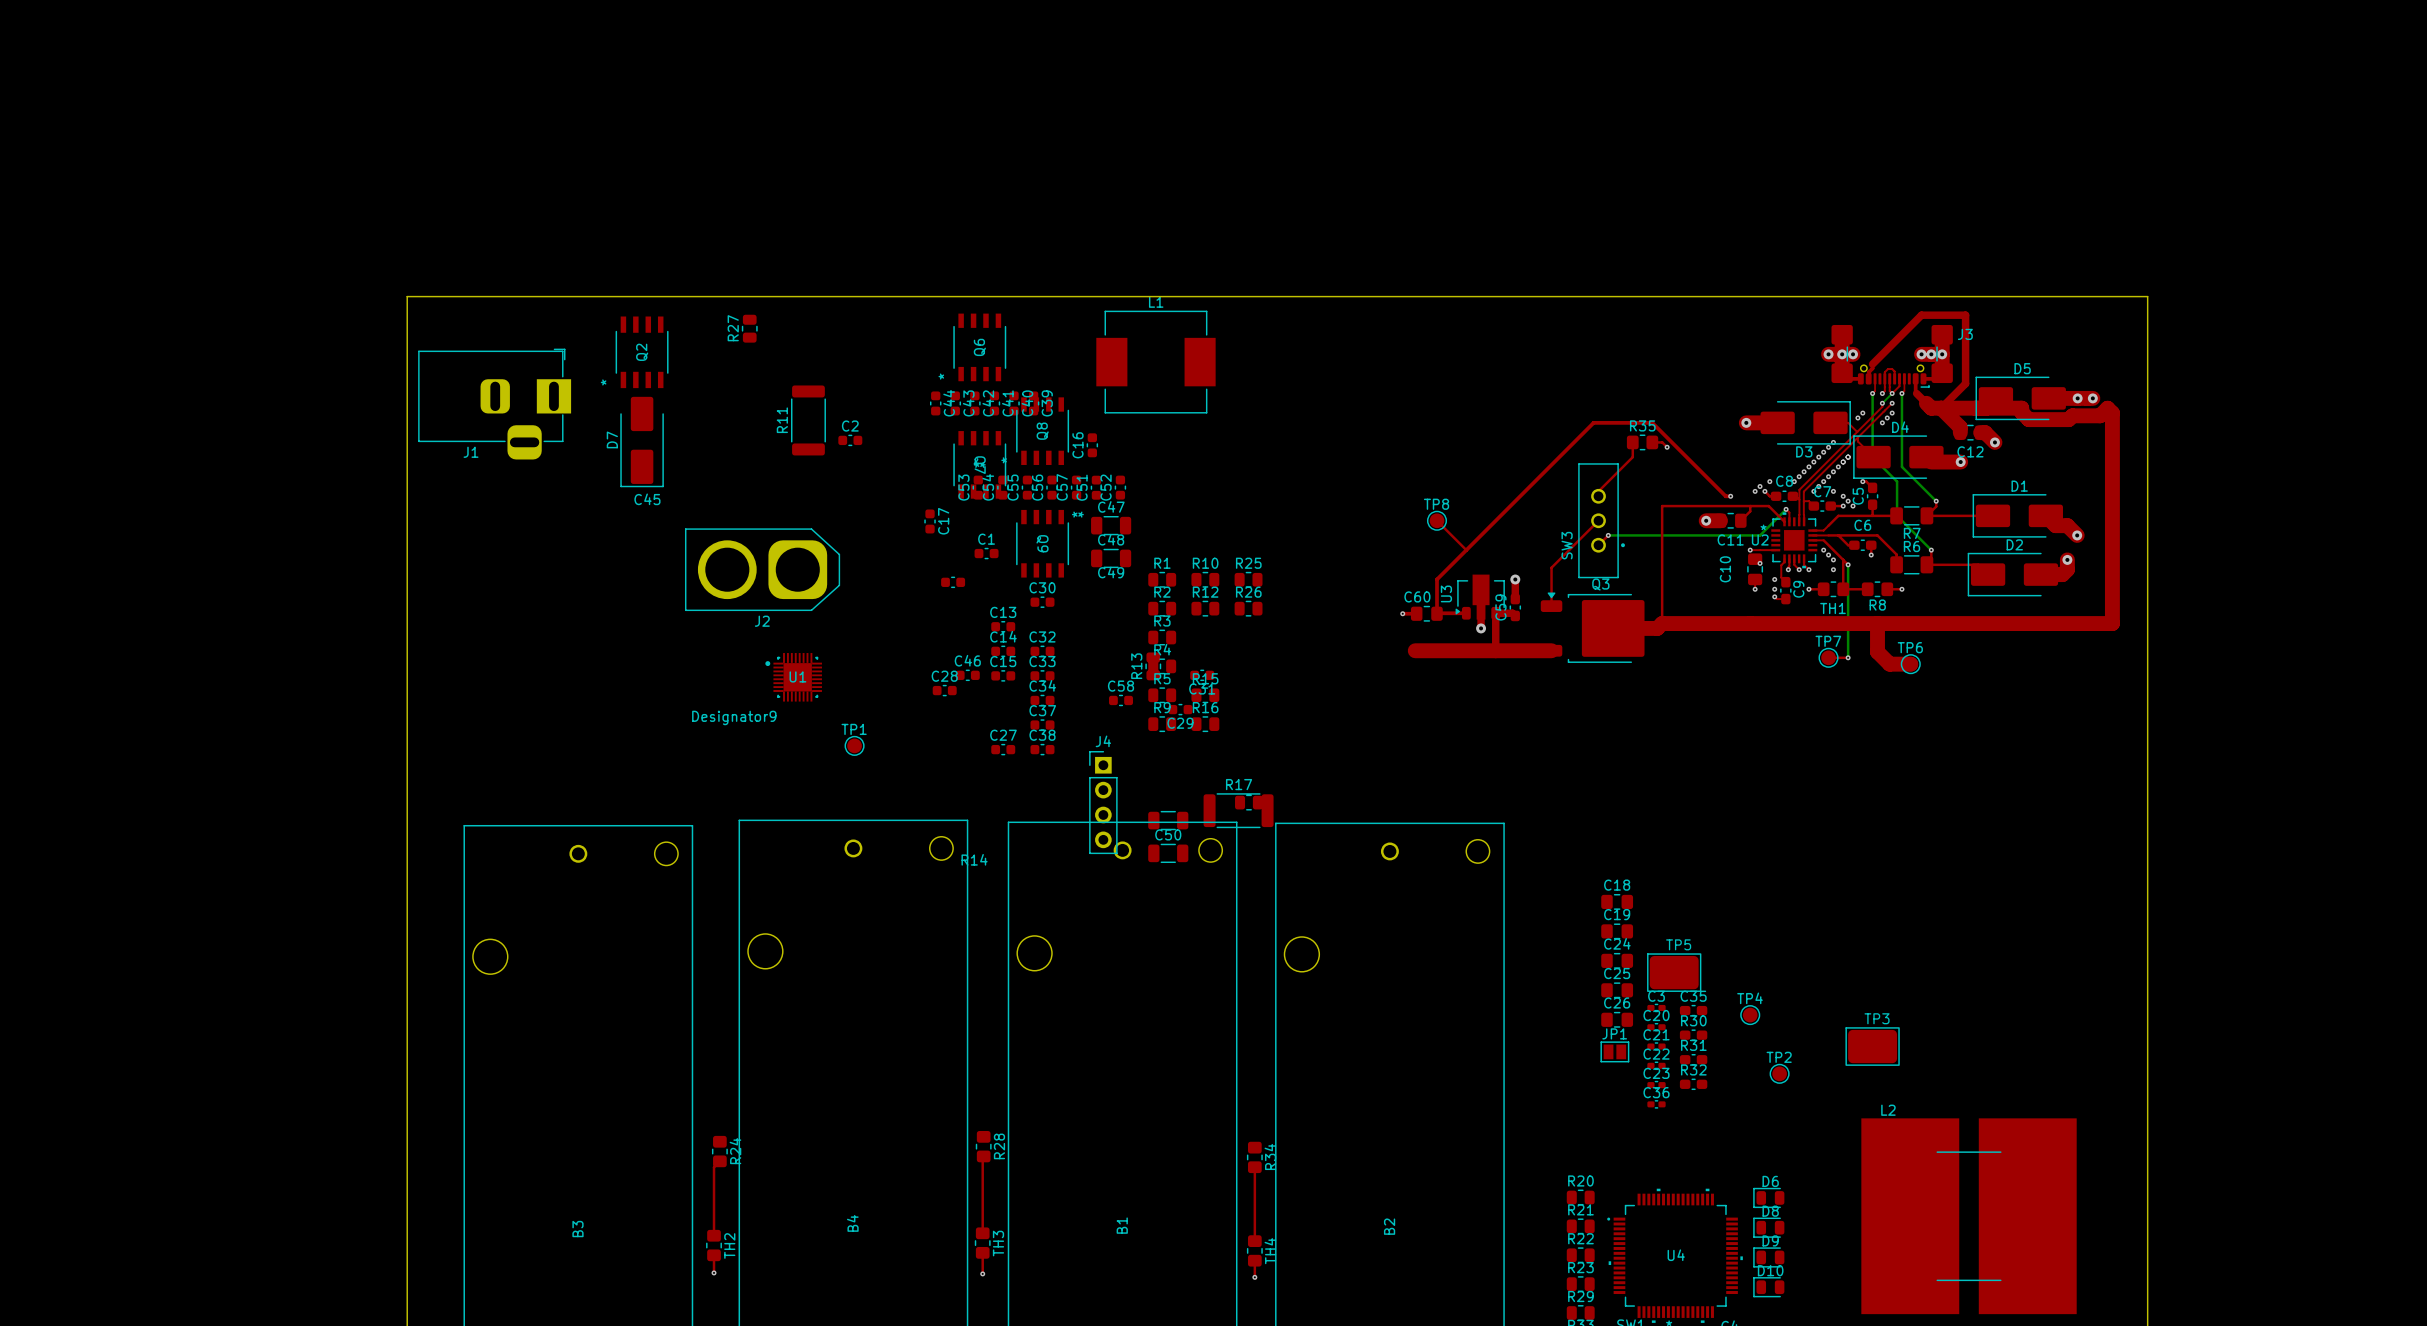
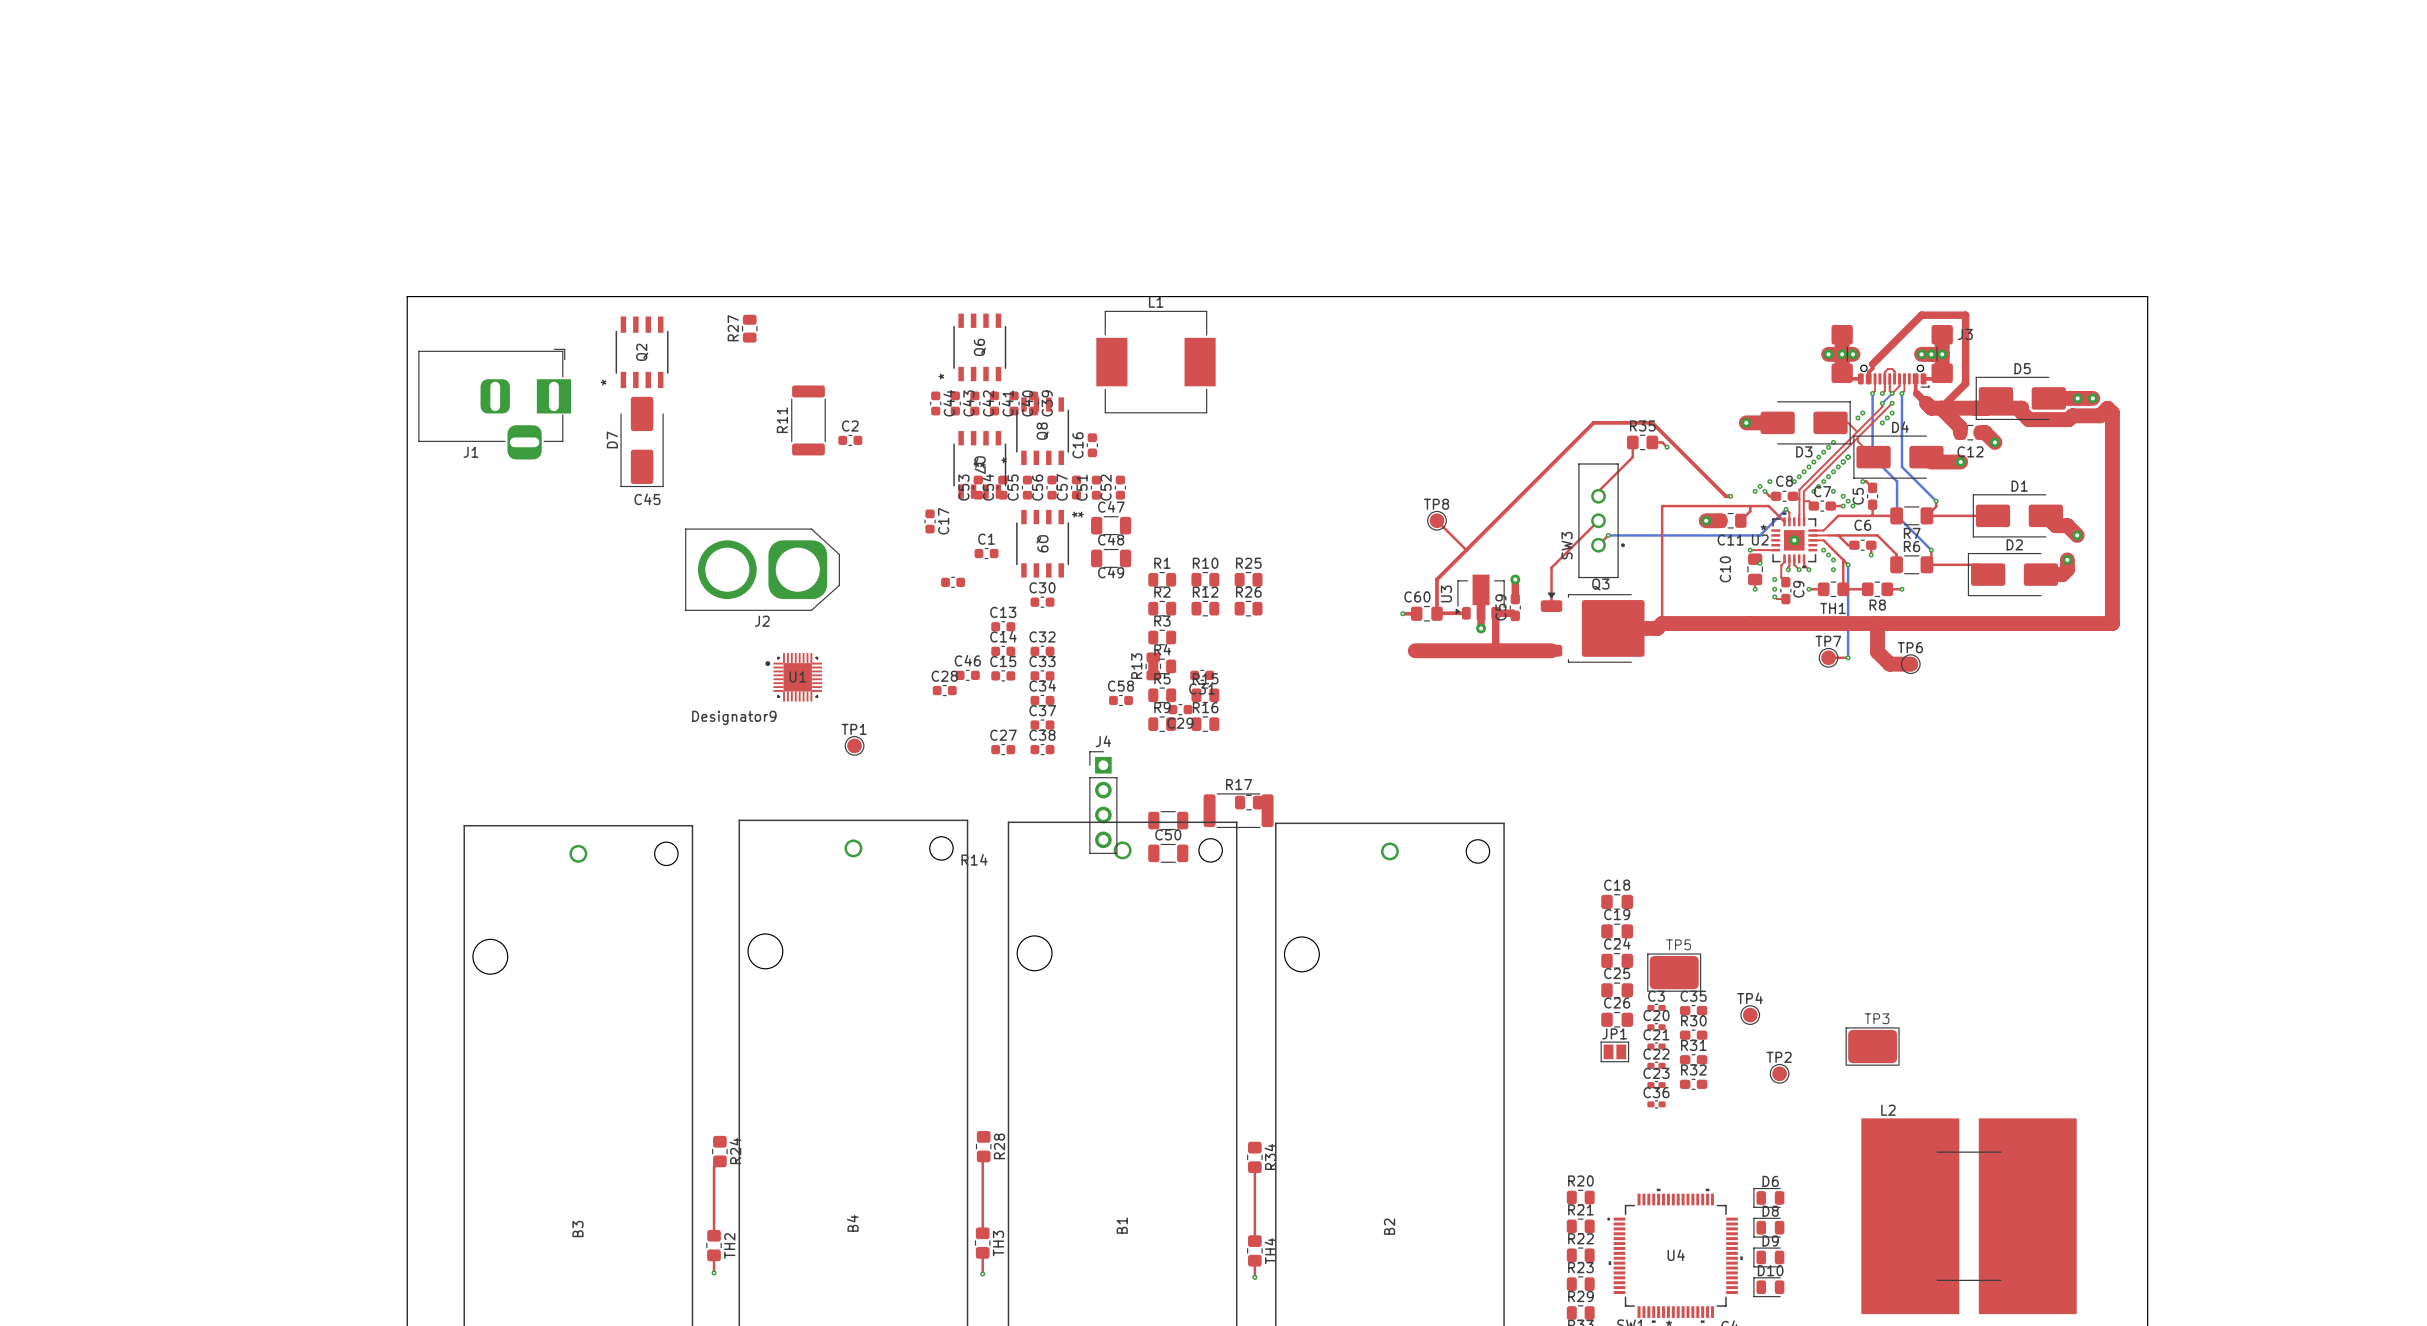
via: none -> (1794, 540)

